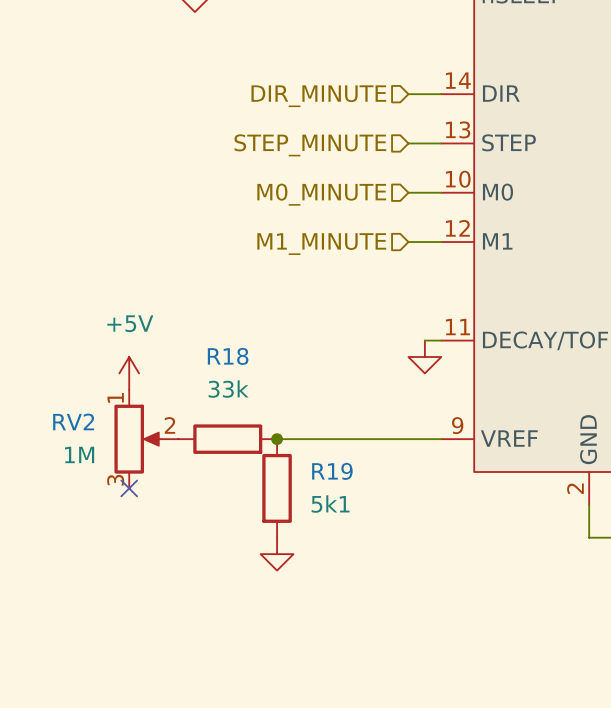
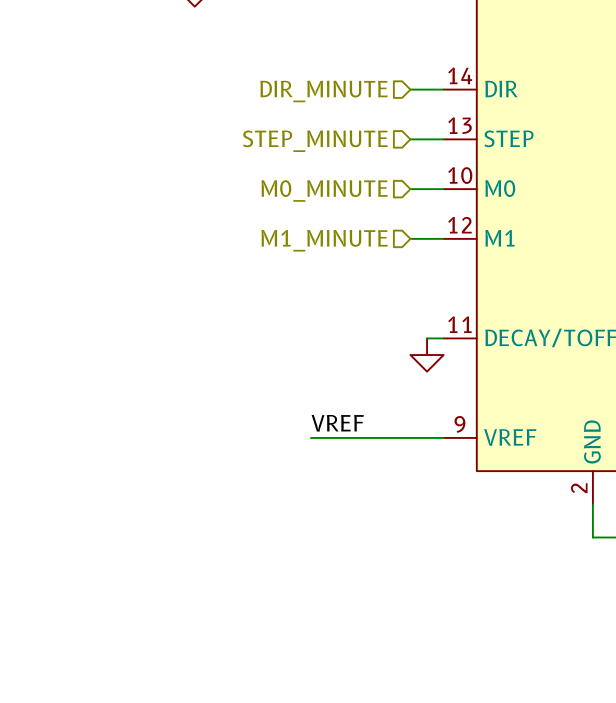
power symbol: +5V (129, 373) -> none
label: none -> VREF (337, 423)
RV2: 1M (146, 439) -> none
R18: 33k (227, 439) -> none
wire: (277, 439) (309, 439) -> none
junction: (277, 439) -> none
no-connect mark: (129, 488) -> none
R19: 5k1 (277, 488) -> none
power symbol: (277, 554) -> none

